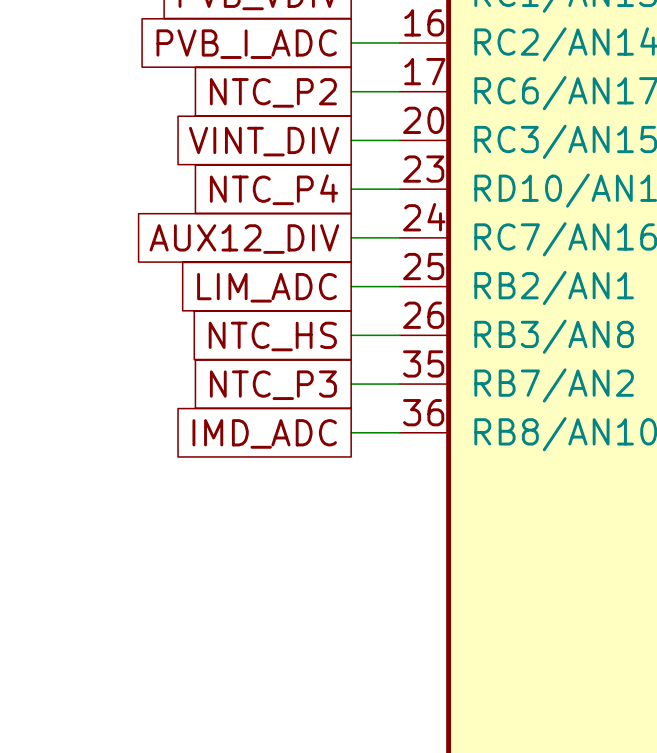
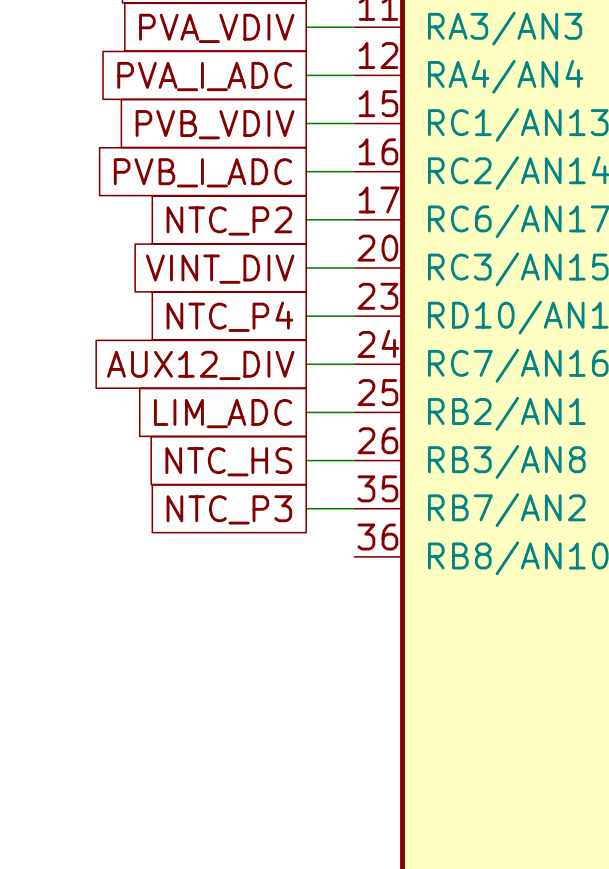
wire: (351, 432) (399, 432) -> none
global label: IMD_ADC (264, 433) -> none

